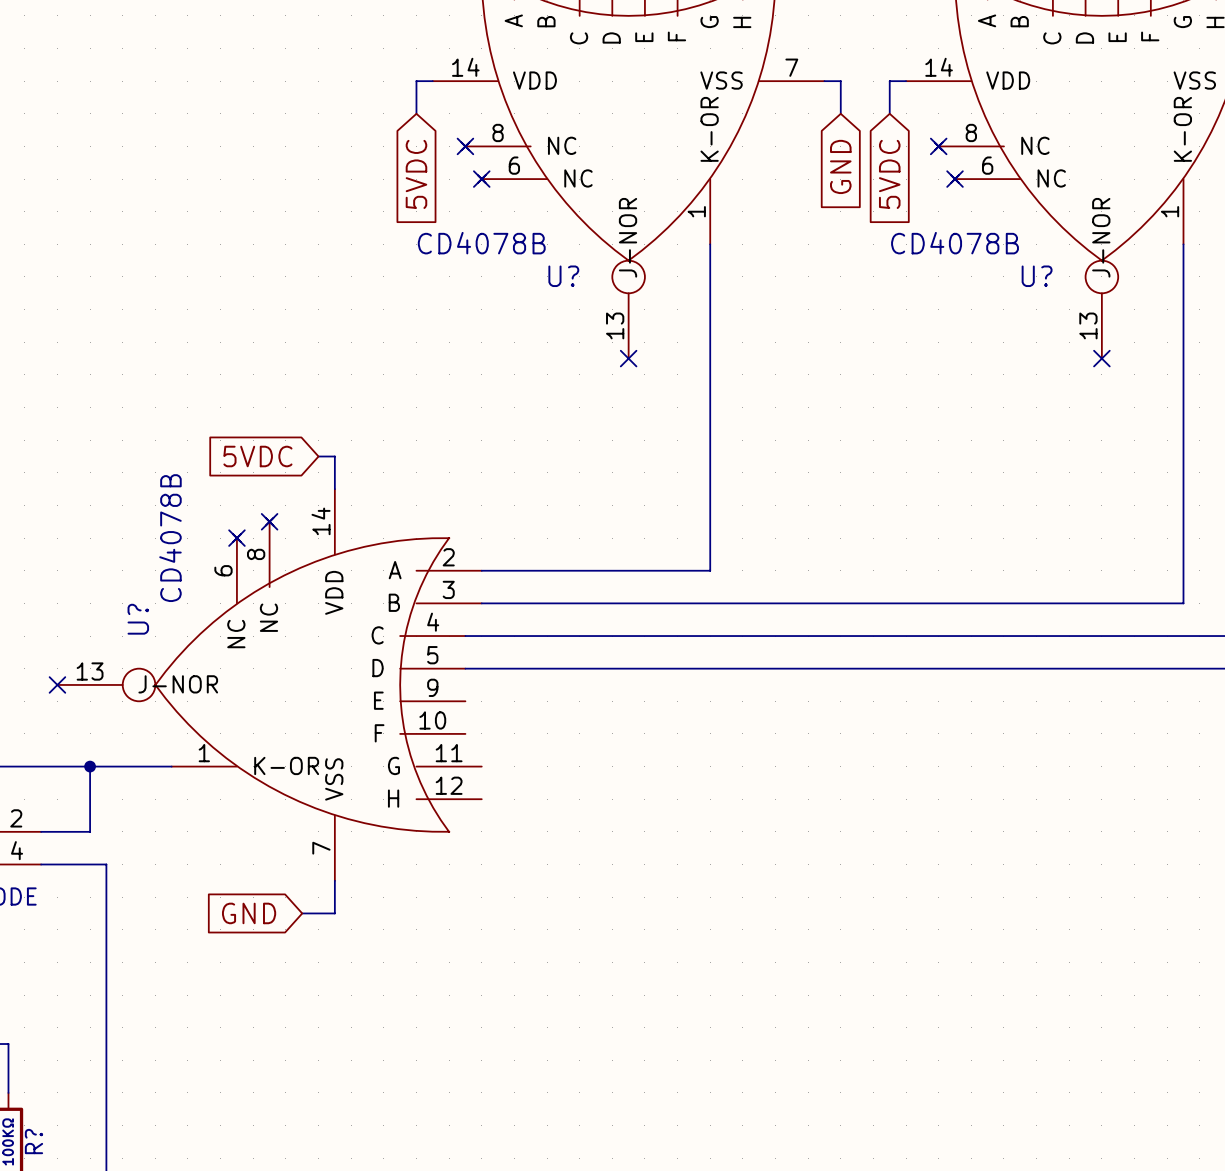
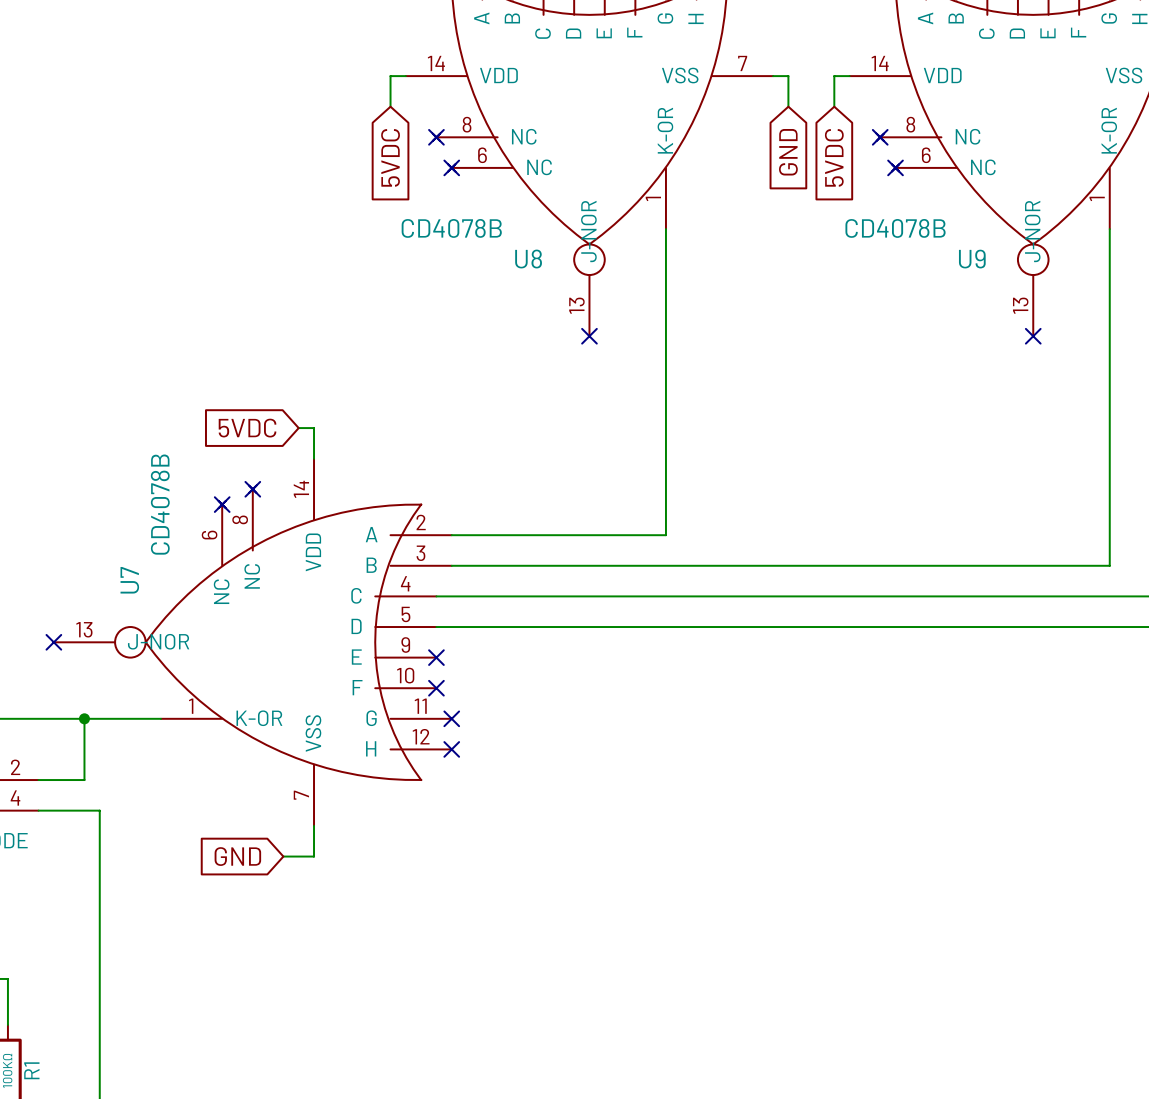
U? name: U? (563, 276) -> U8 (528, 259)
U? name: U? (1037, 276) -> U9 (972, 259)
U? name: U? (138, 619) -> U7 (129, 580)
no-connect mark: none -> (436, 657)
no-connect mark: none -> (436, 688)
no-connect mark: none -> (451, 718)
no-connect mark: none -> (451, 749)
R? name: R? (33, 1141) -> R1 (31, 1070)

